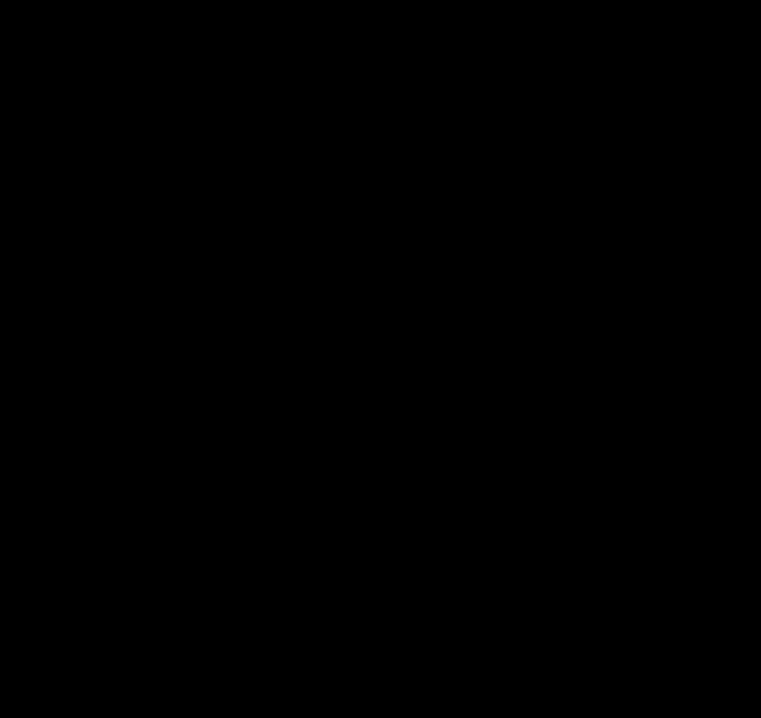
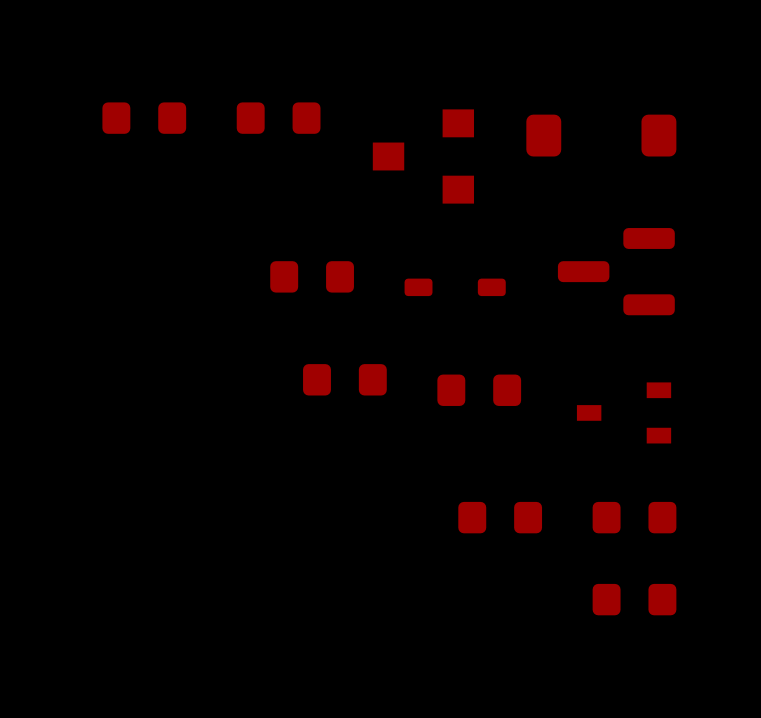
part: none -> (144, 118)
part: none -> (278, 118)
part: none -> (601, 135)
part: none -> (423, 156)
part: none -> (616, 271)
part: none -> (312, 276)
part: none -> (455, 287)
part: none -> (344, 379)
part: none -> (479, 390)
part: none -> (624, 412)
part: none -> (500, 517)
part: none -> (634, 517)
part: none -> (634, 599)

